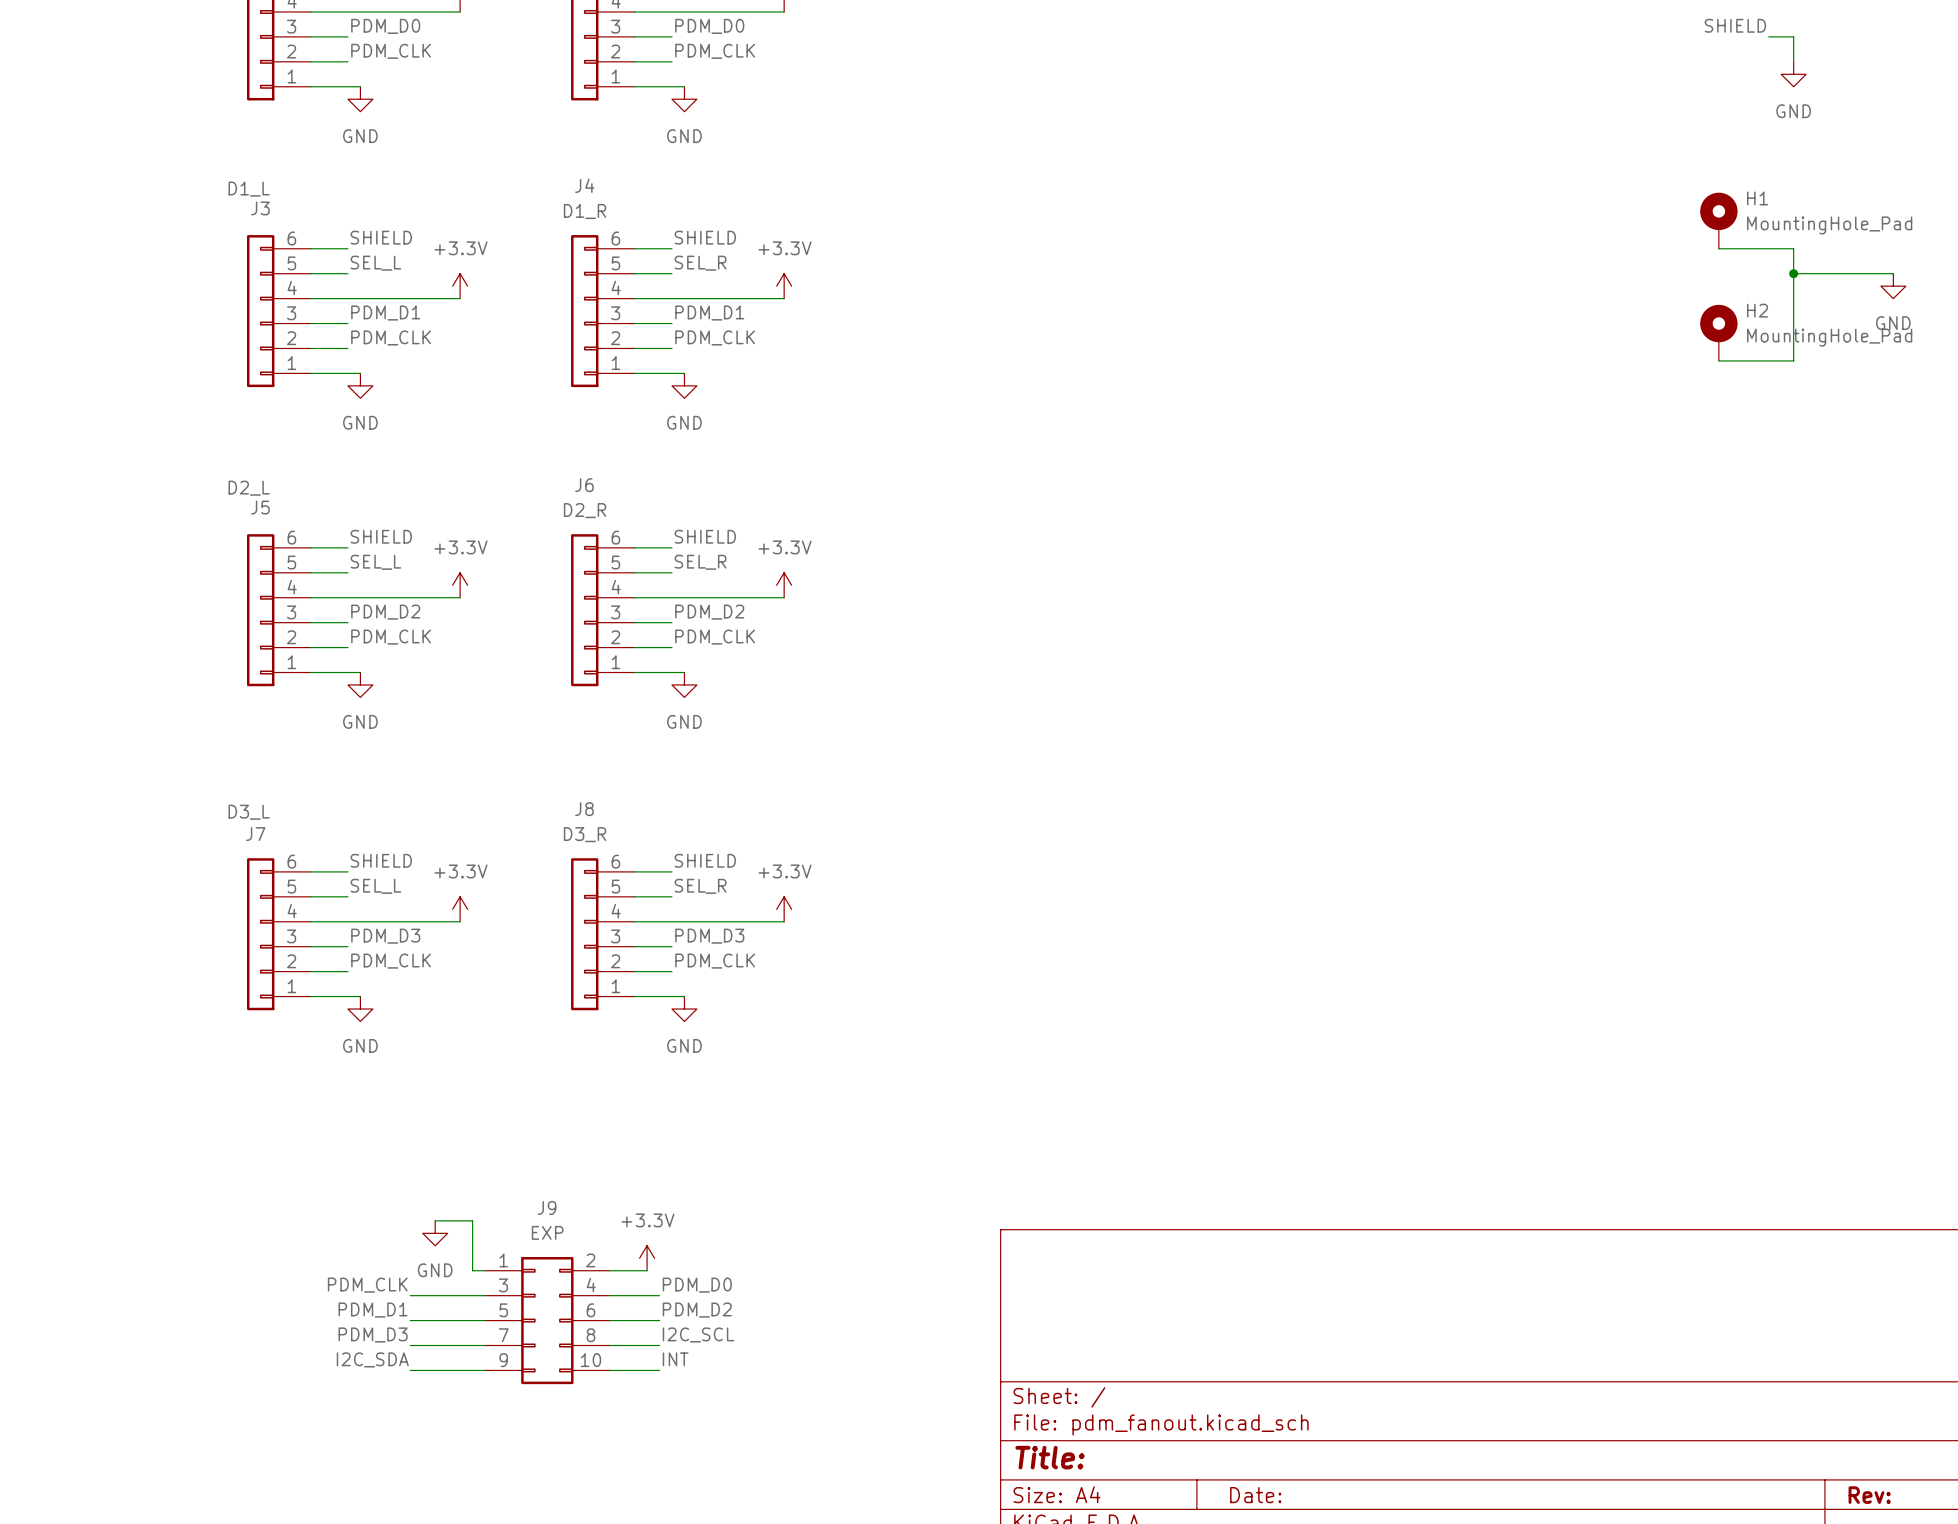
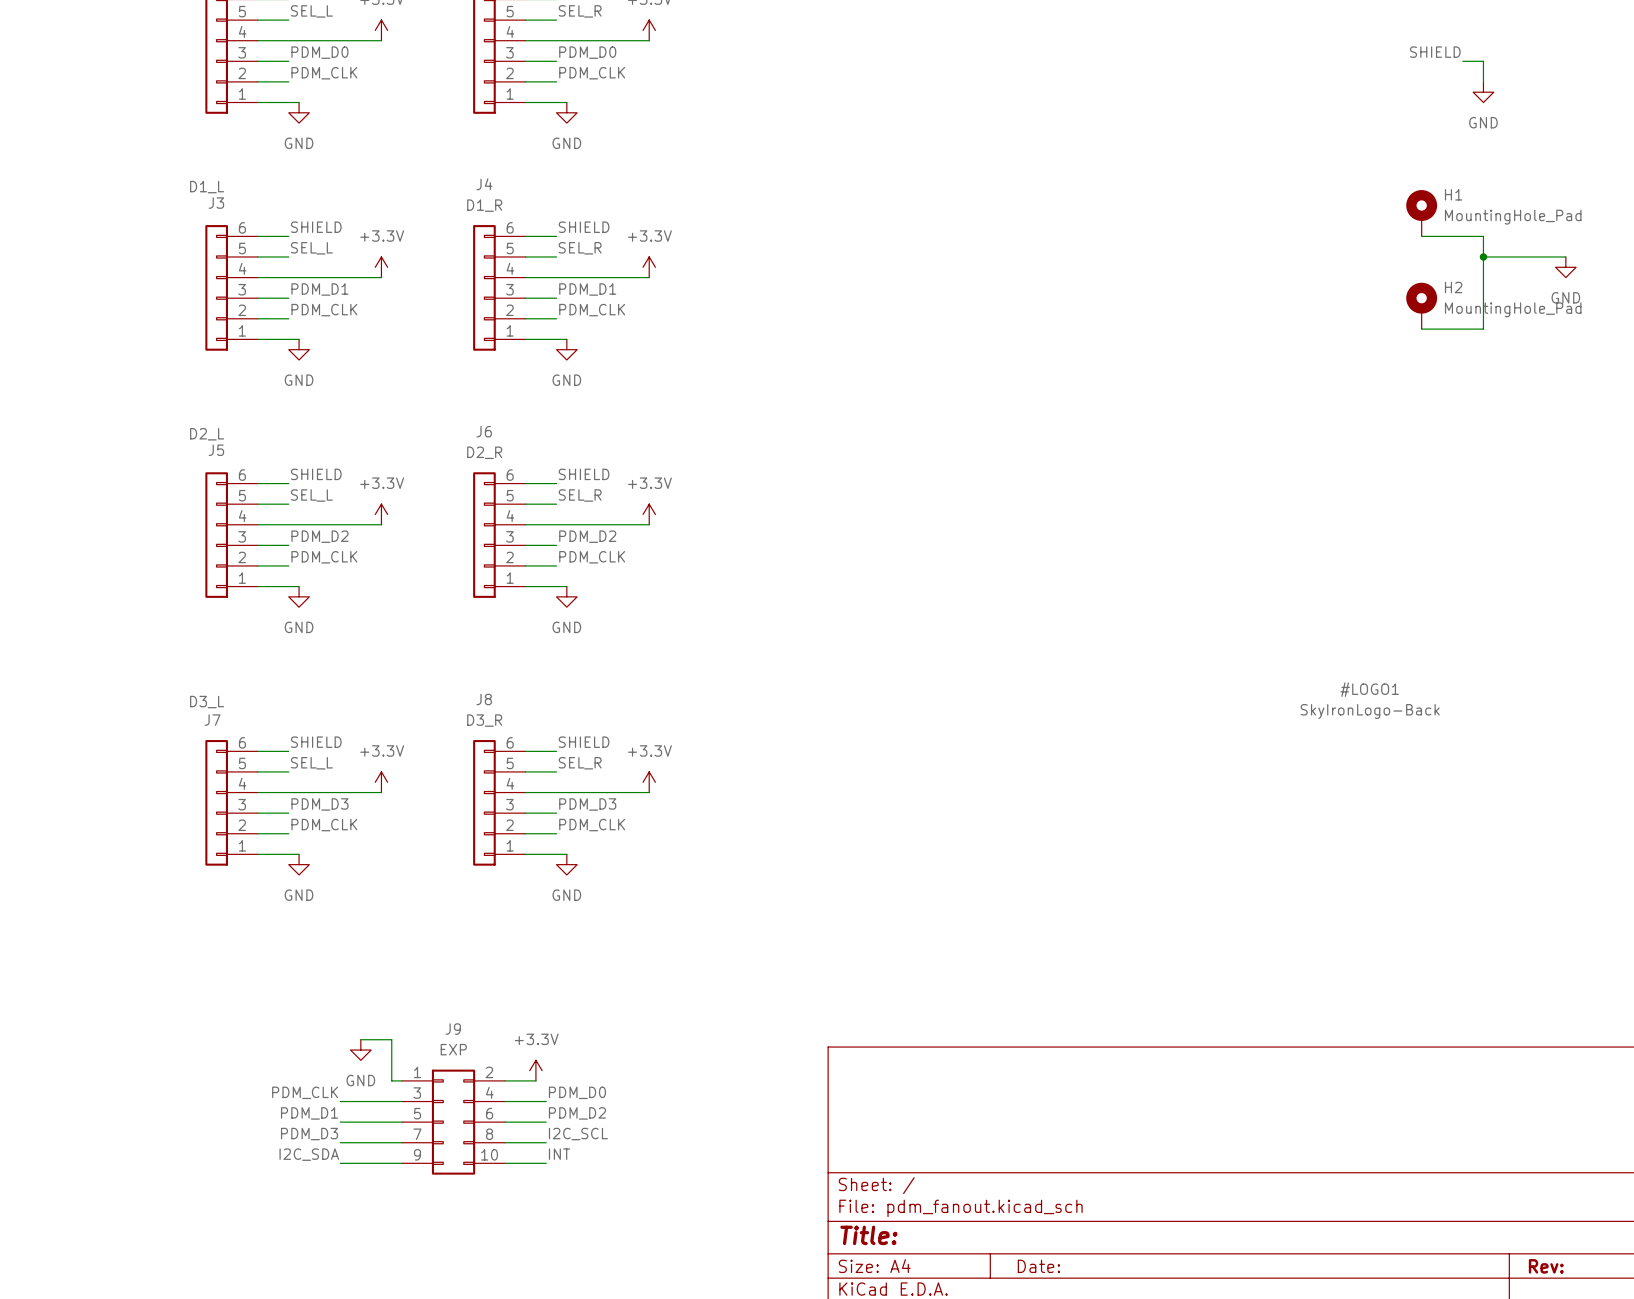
#LOGO1: none -> SkyIronLogo-Back (1370, 700)

